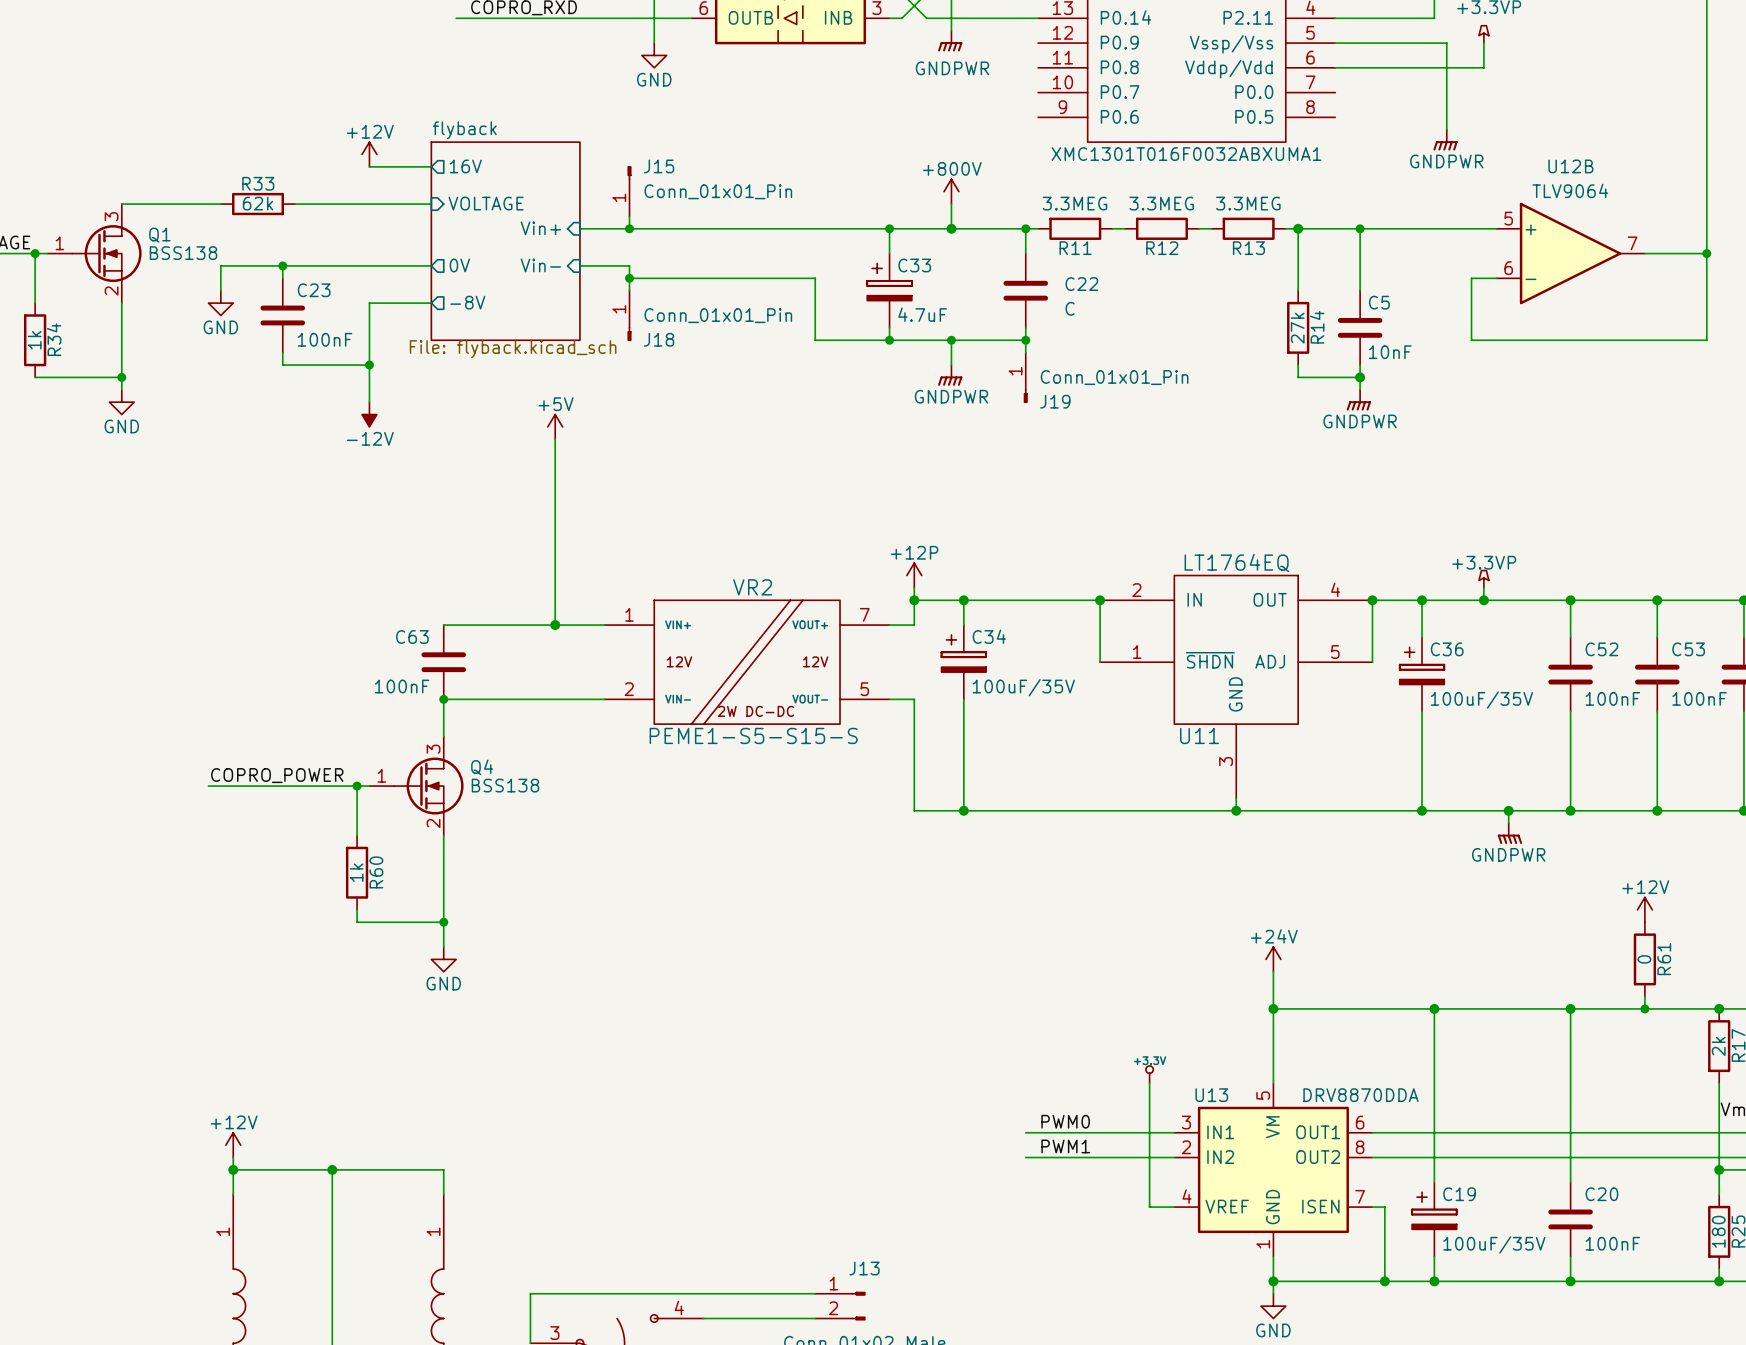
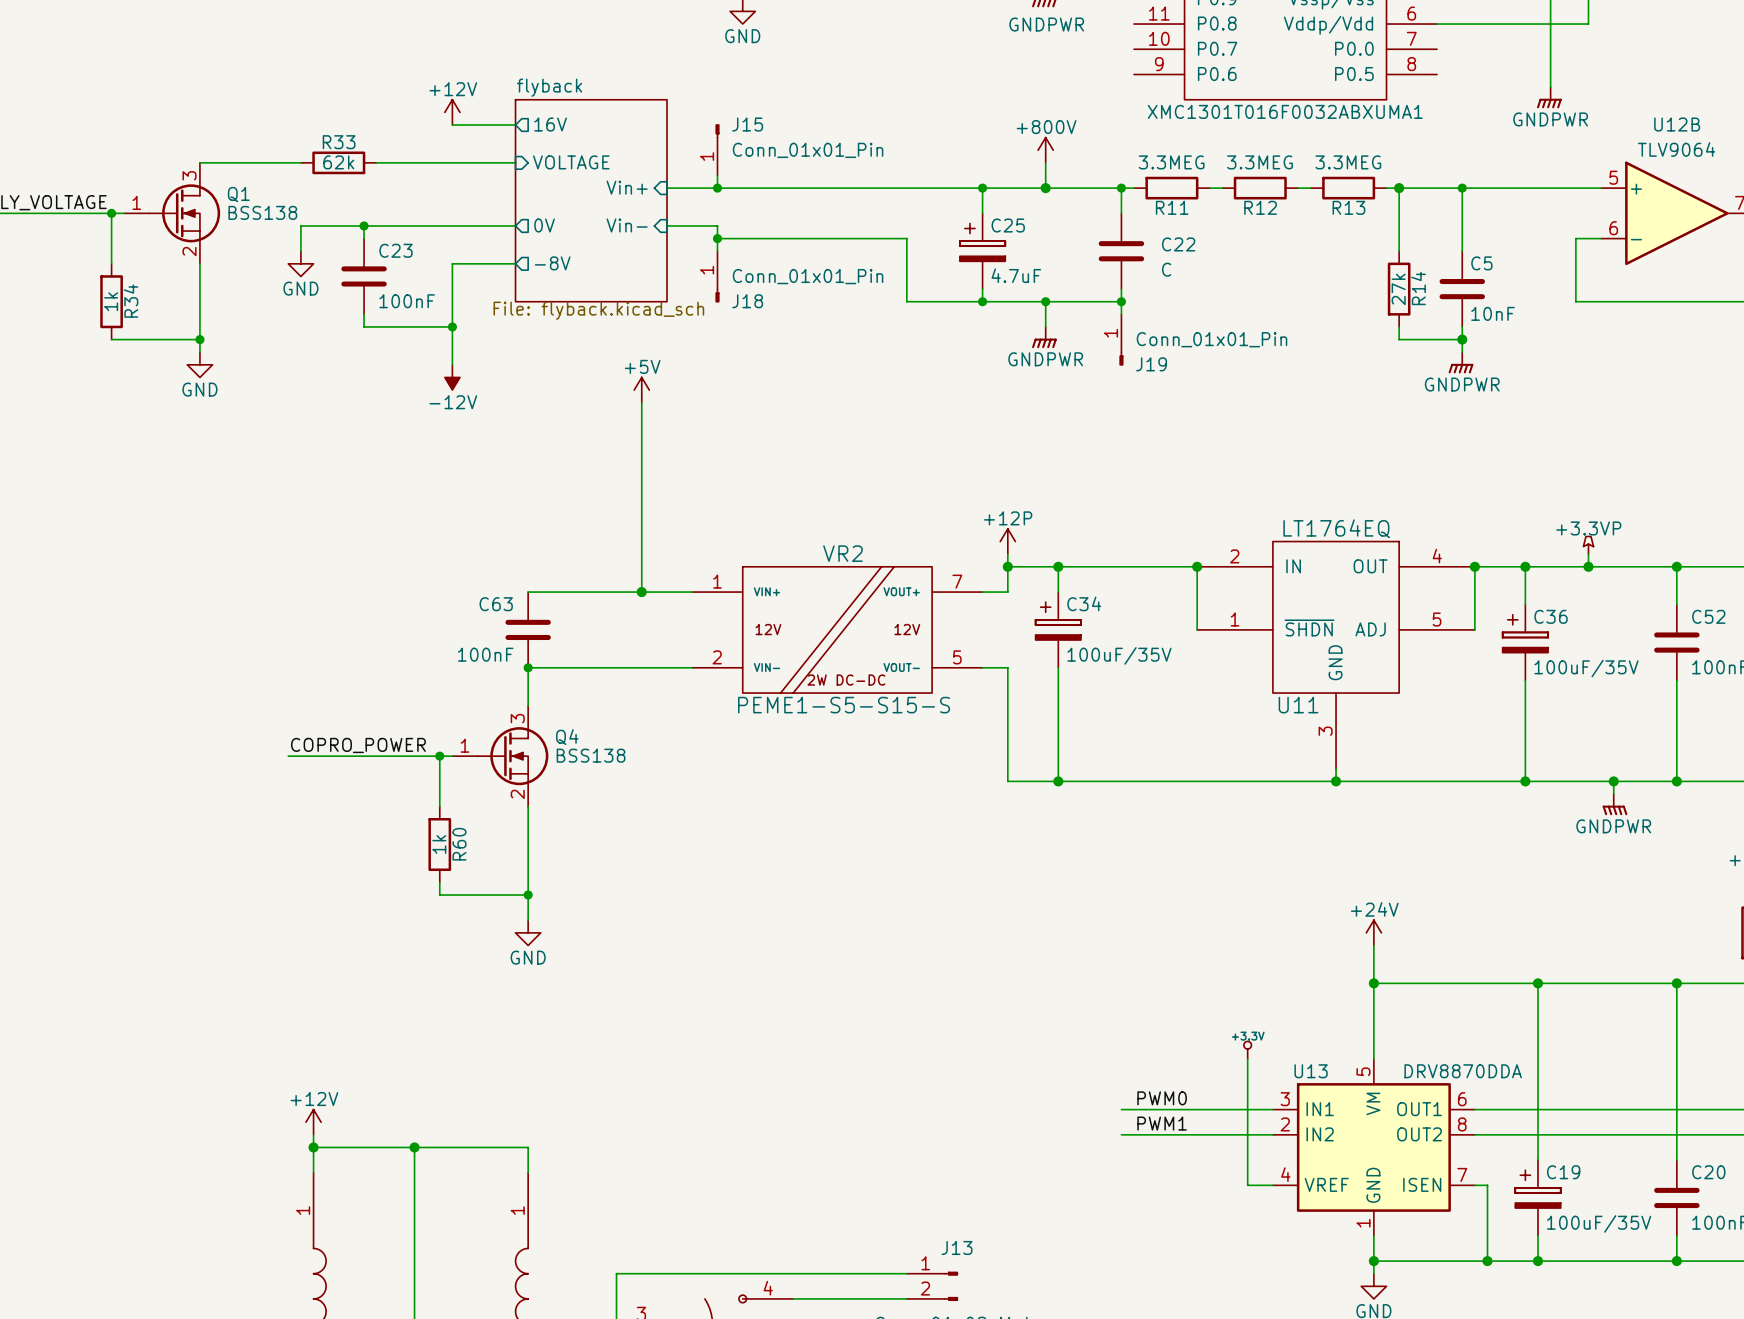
C33 name: C33 (914, 265) -> C25 (1008, 225)

